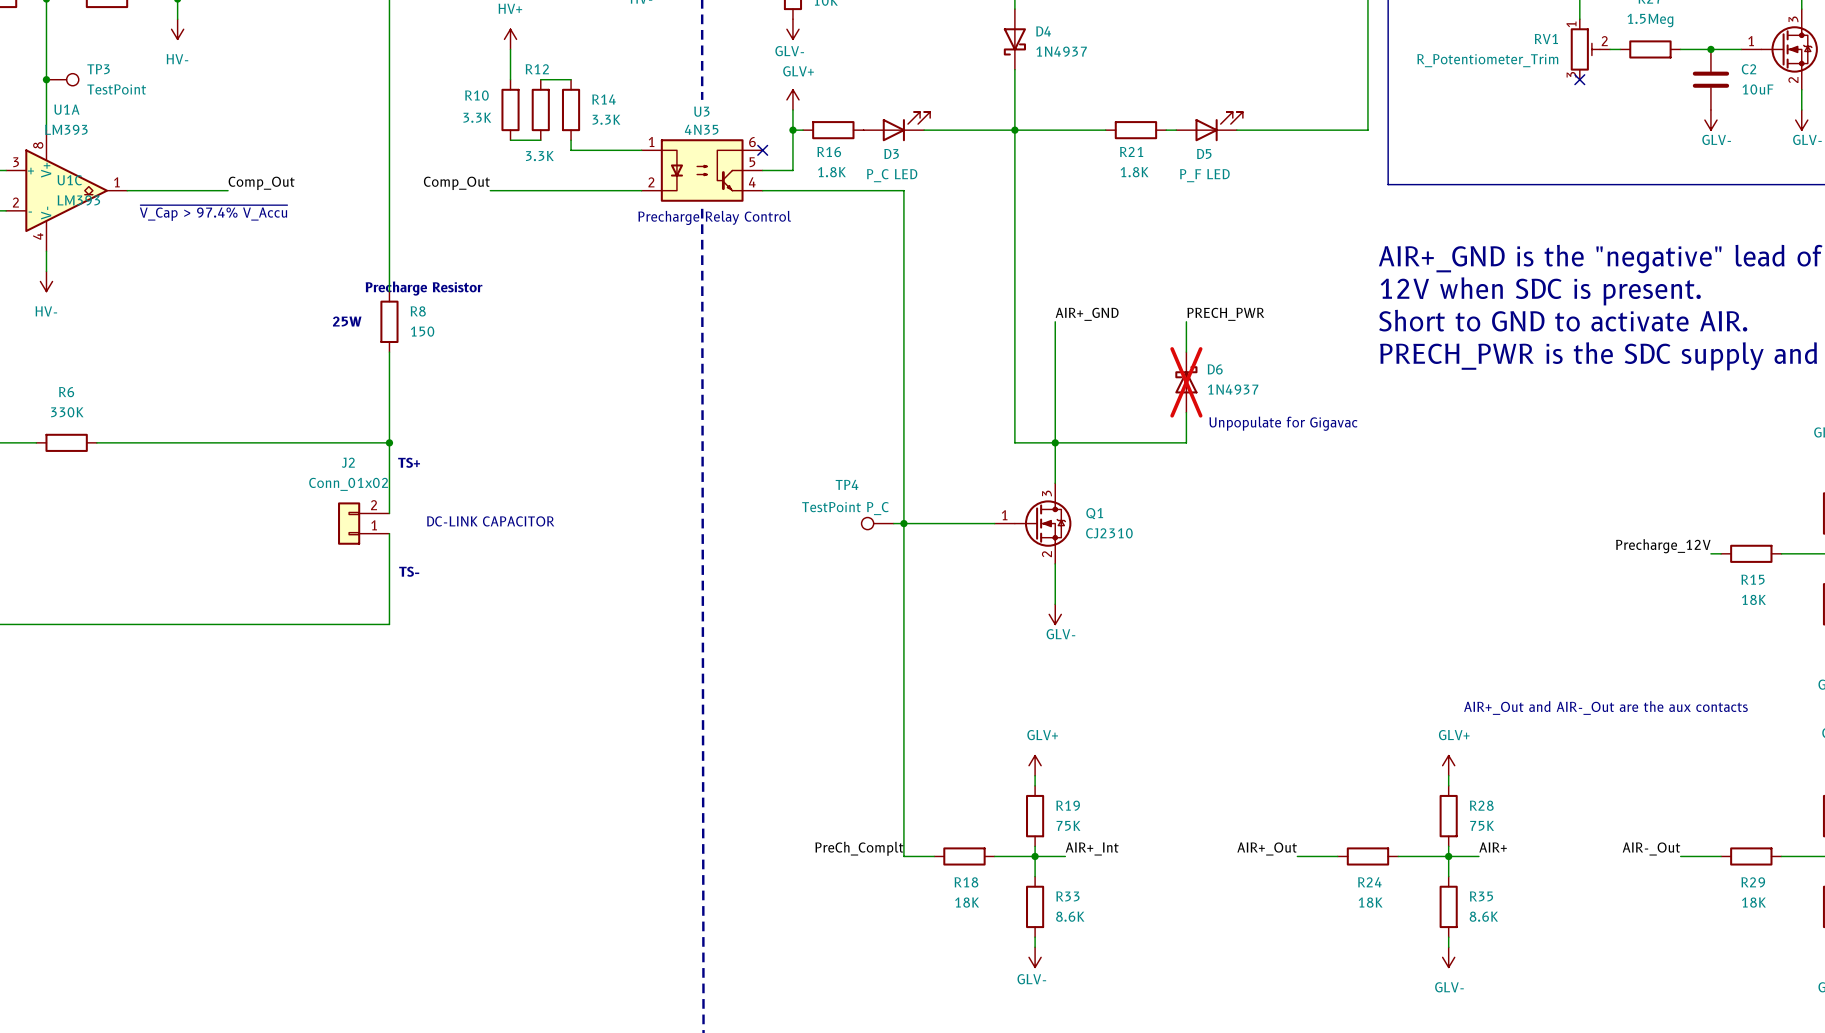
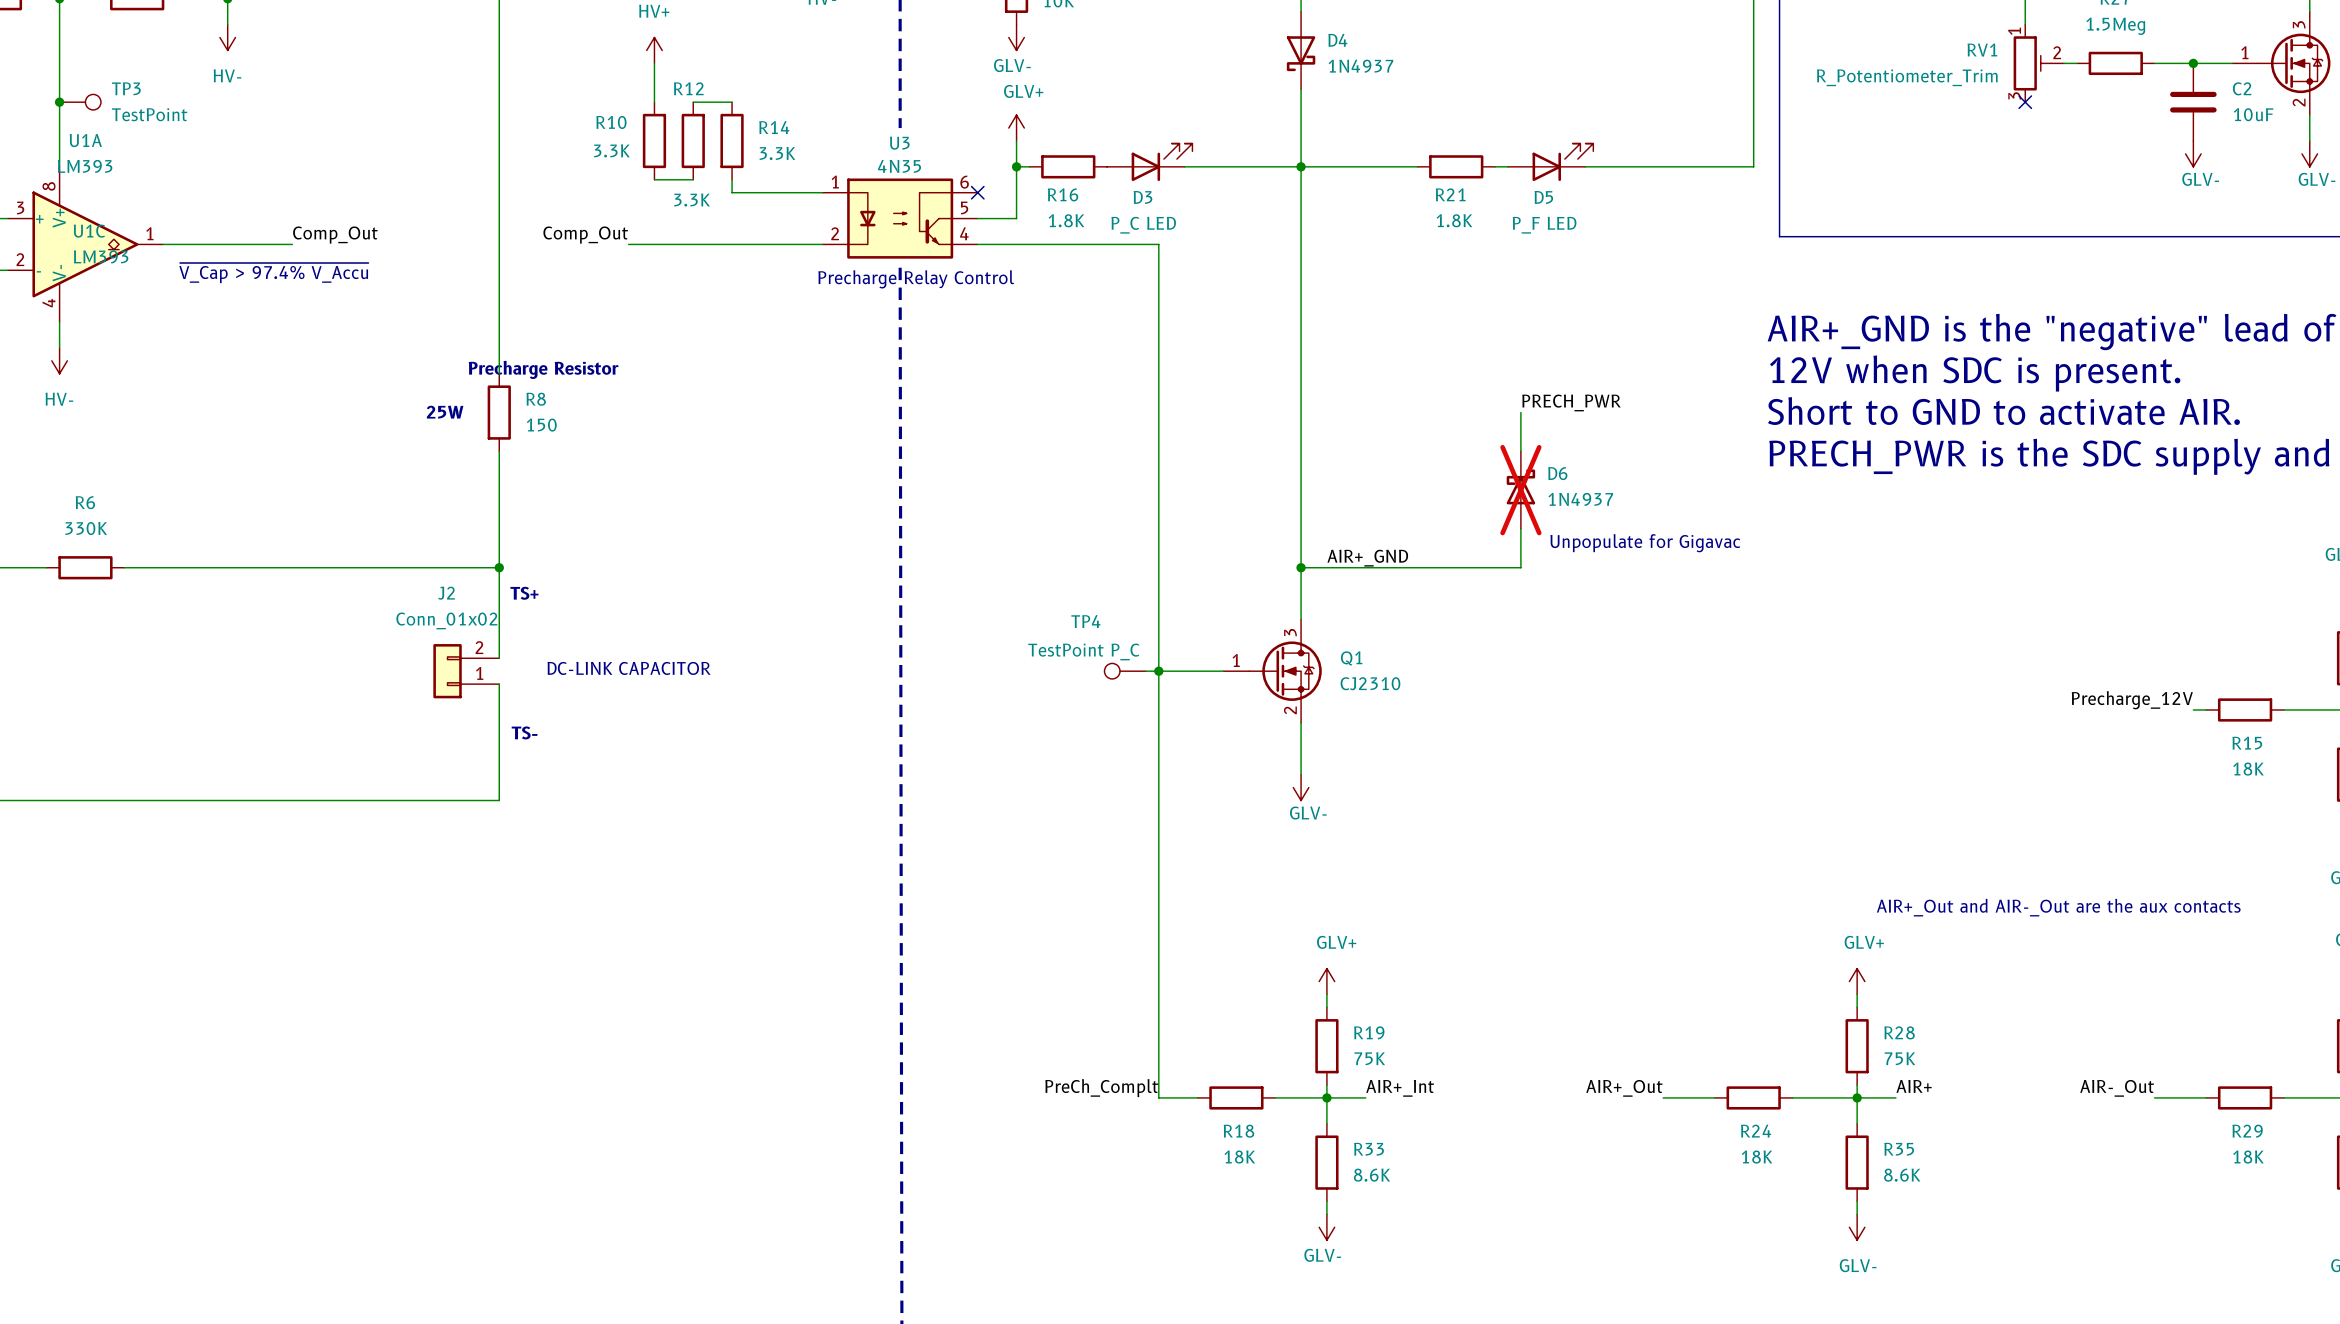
label position: AIR+_GND (1087, 314) -> AIR+_GND (1367, 558)
wire: (1055, 321) (1055, 483) -> none
wire: none -> (1301, 567) (1301, 619)
junction position: (1055, 442) -> (1301, 567)
Q1 position: (1033, 523) -> (1272, 671)
wire: (1055, 563) (1055, 604) -> (1301, 722) (1301, 774)
power symbol position: GLV- (1055, 614) -> GLV- (1301, 787)

